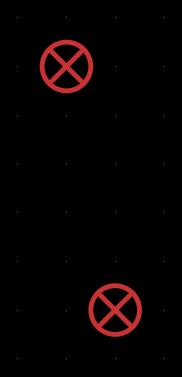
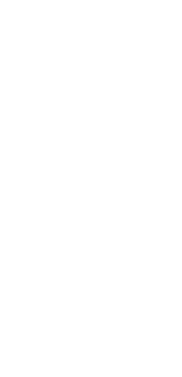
part: (66, 66) -> none
part: (115, 310) -> none

